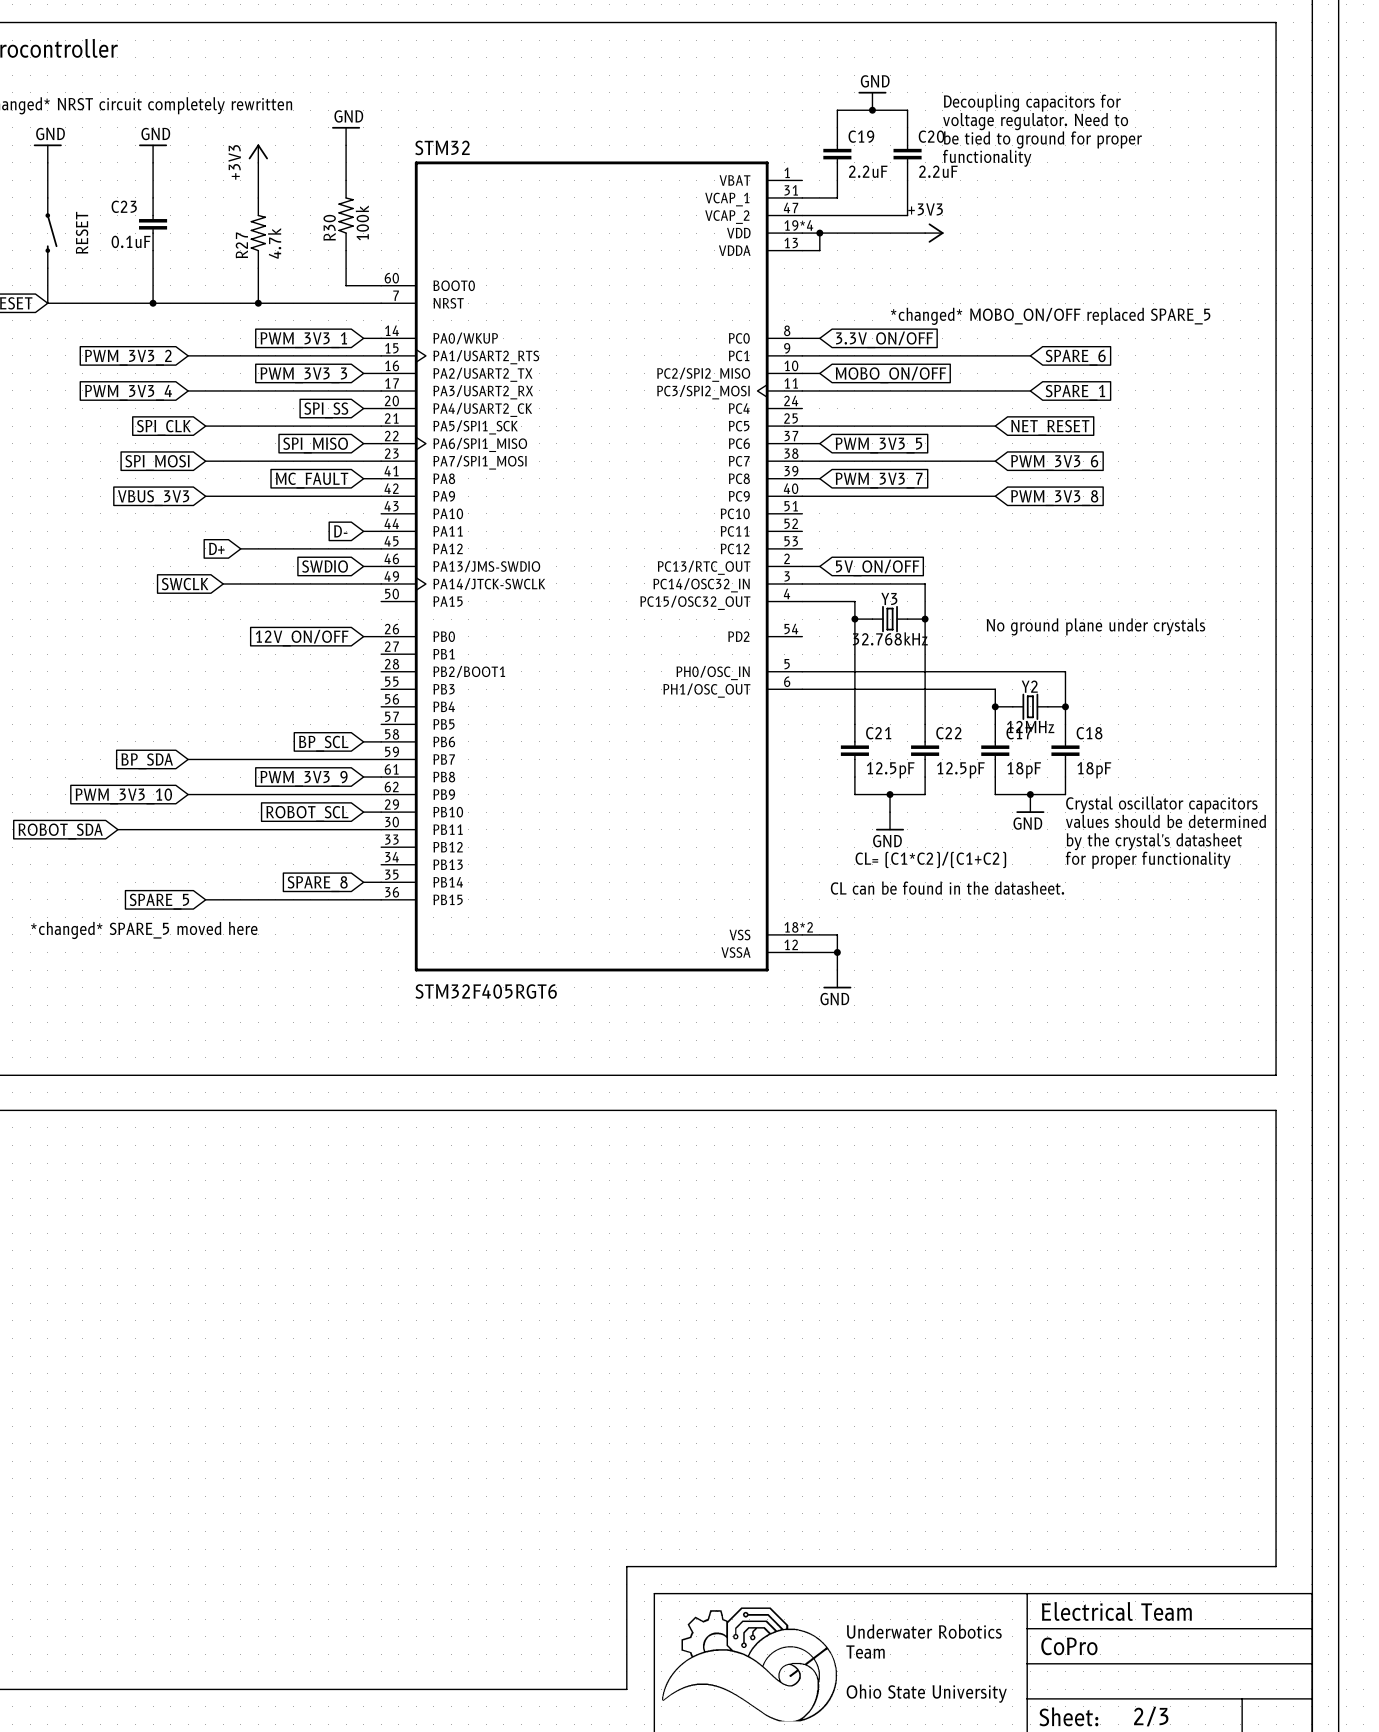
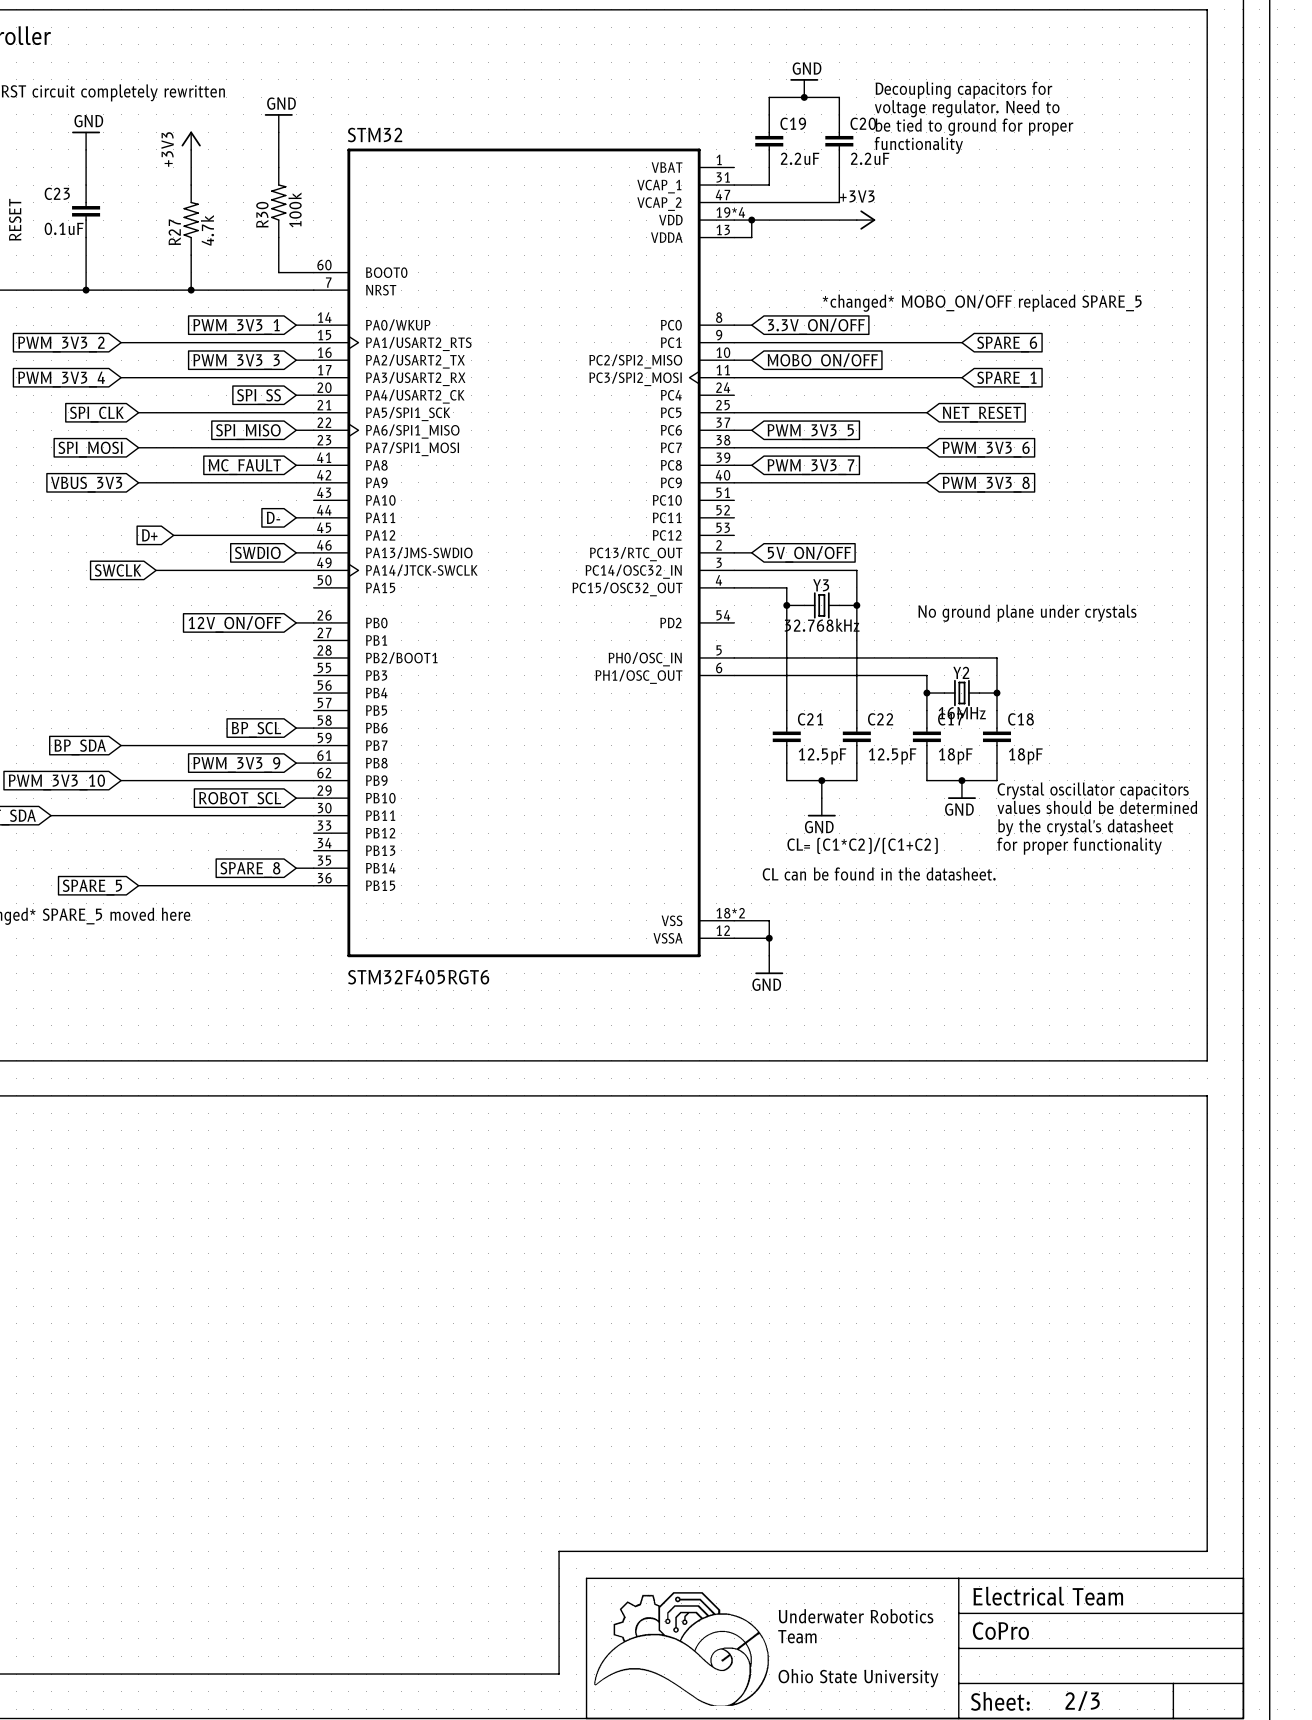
Y2 value: 12MHz (1030, 727) -> 16MHz (962, 713)

